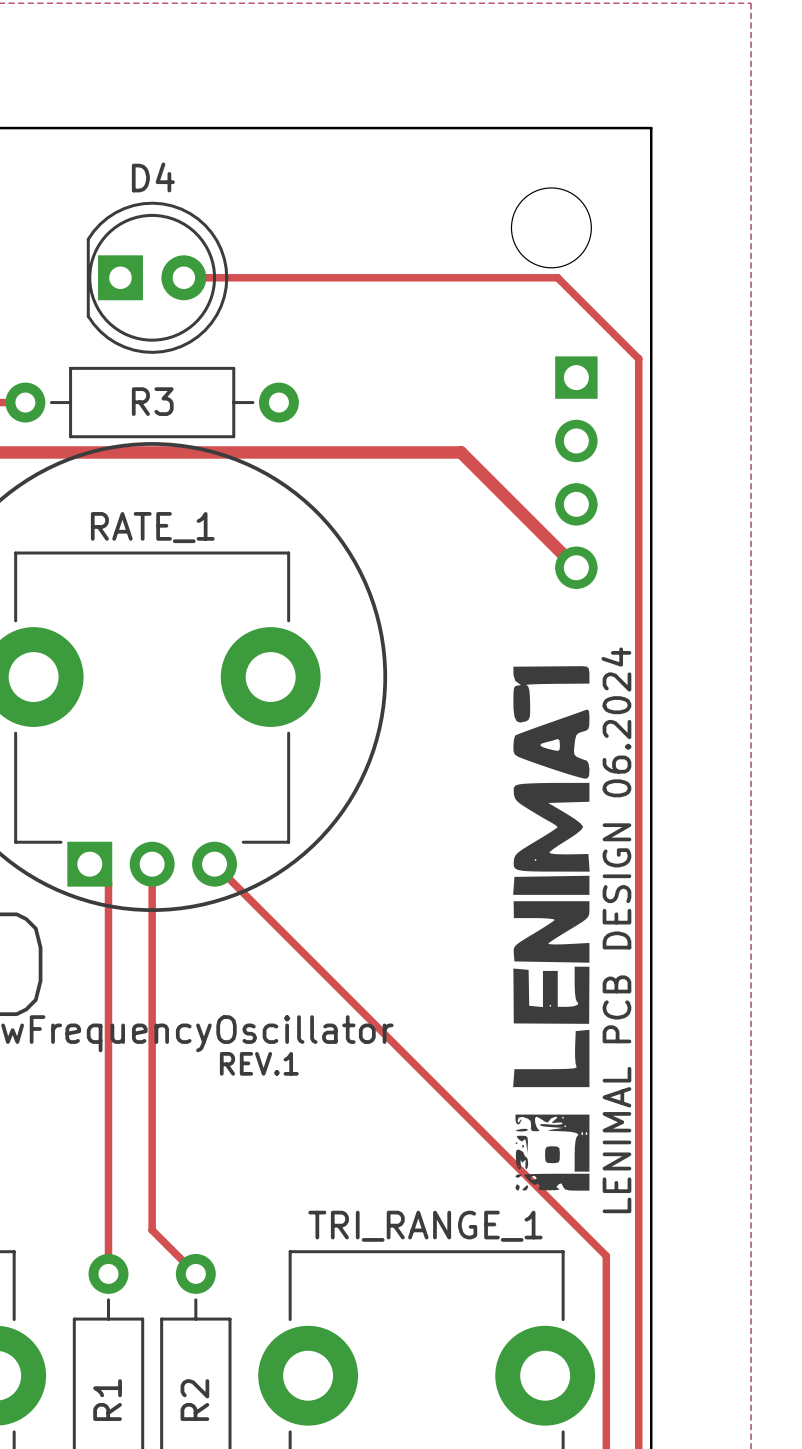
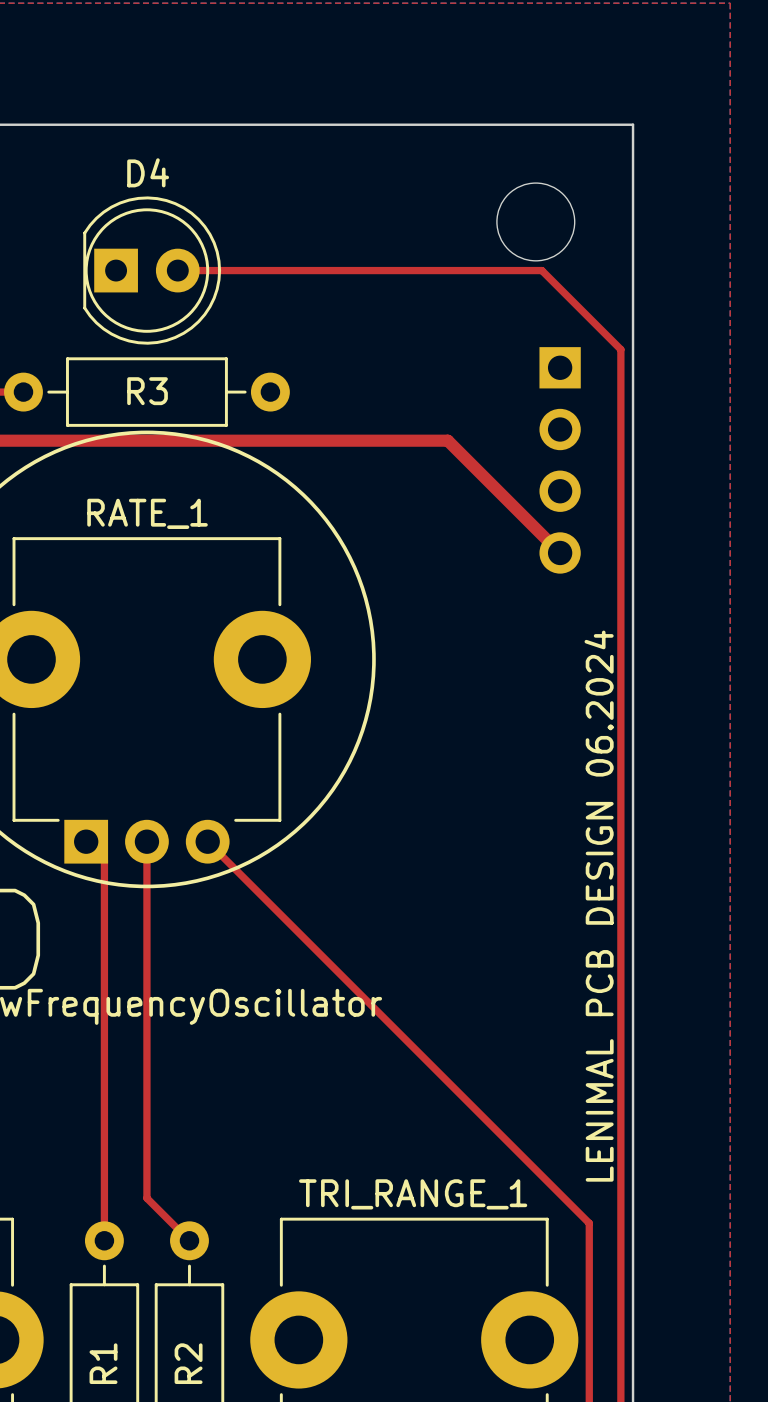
drawing: [513, 666, 590, 1191] -> none
text: REV.1 (259, 1063) -> none

